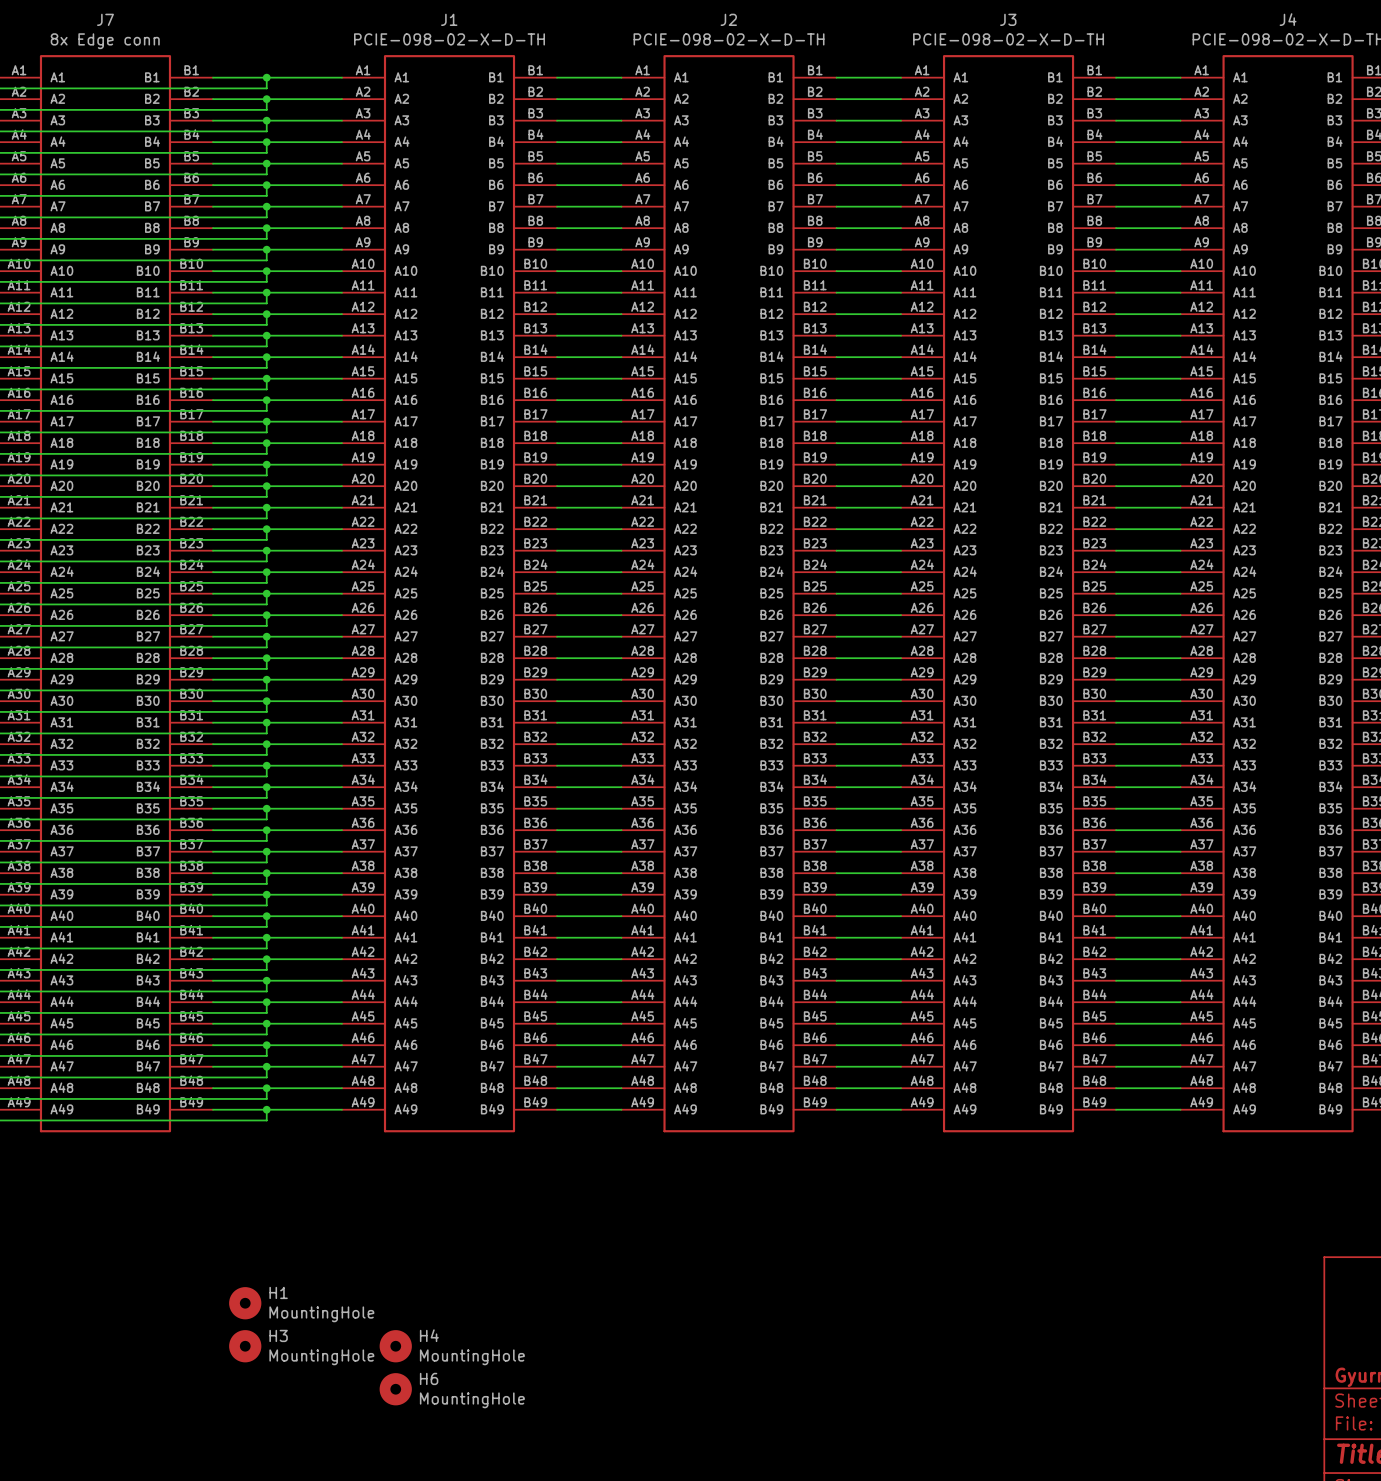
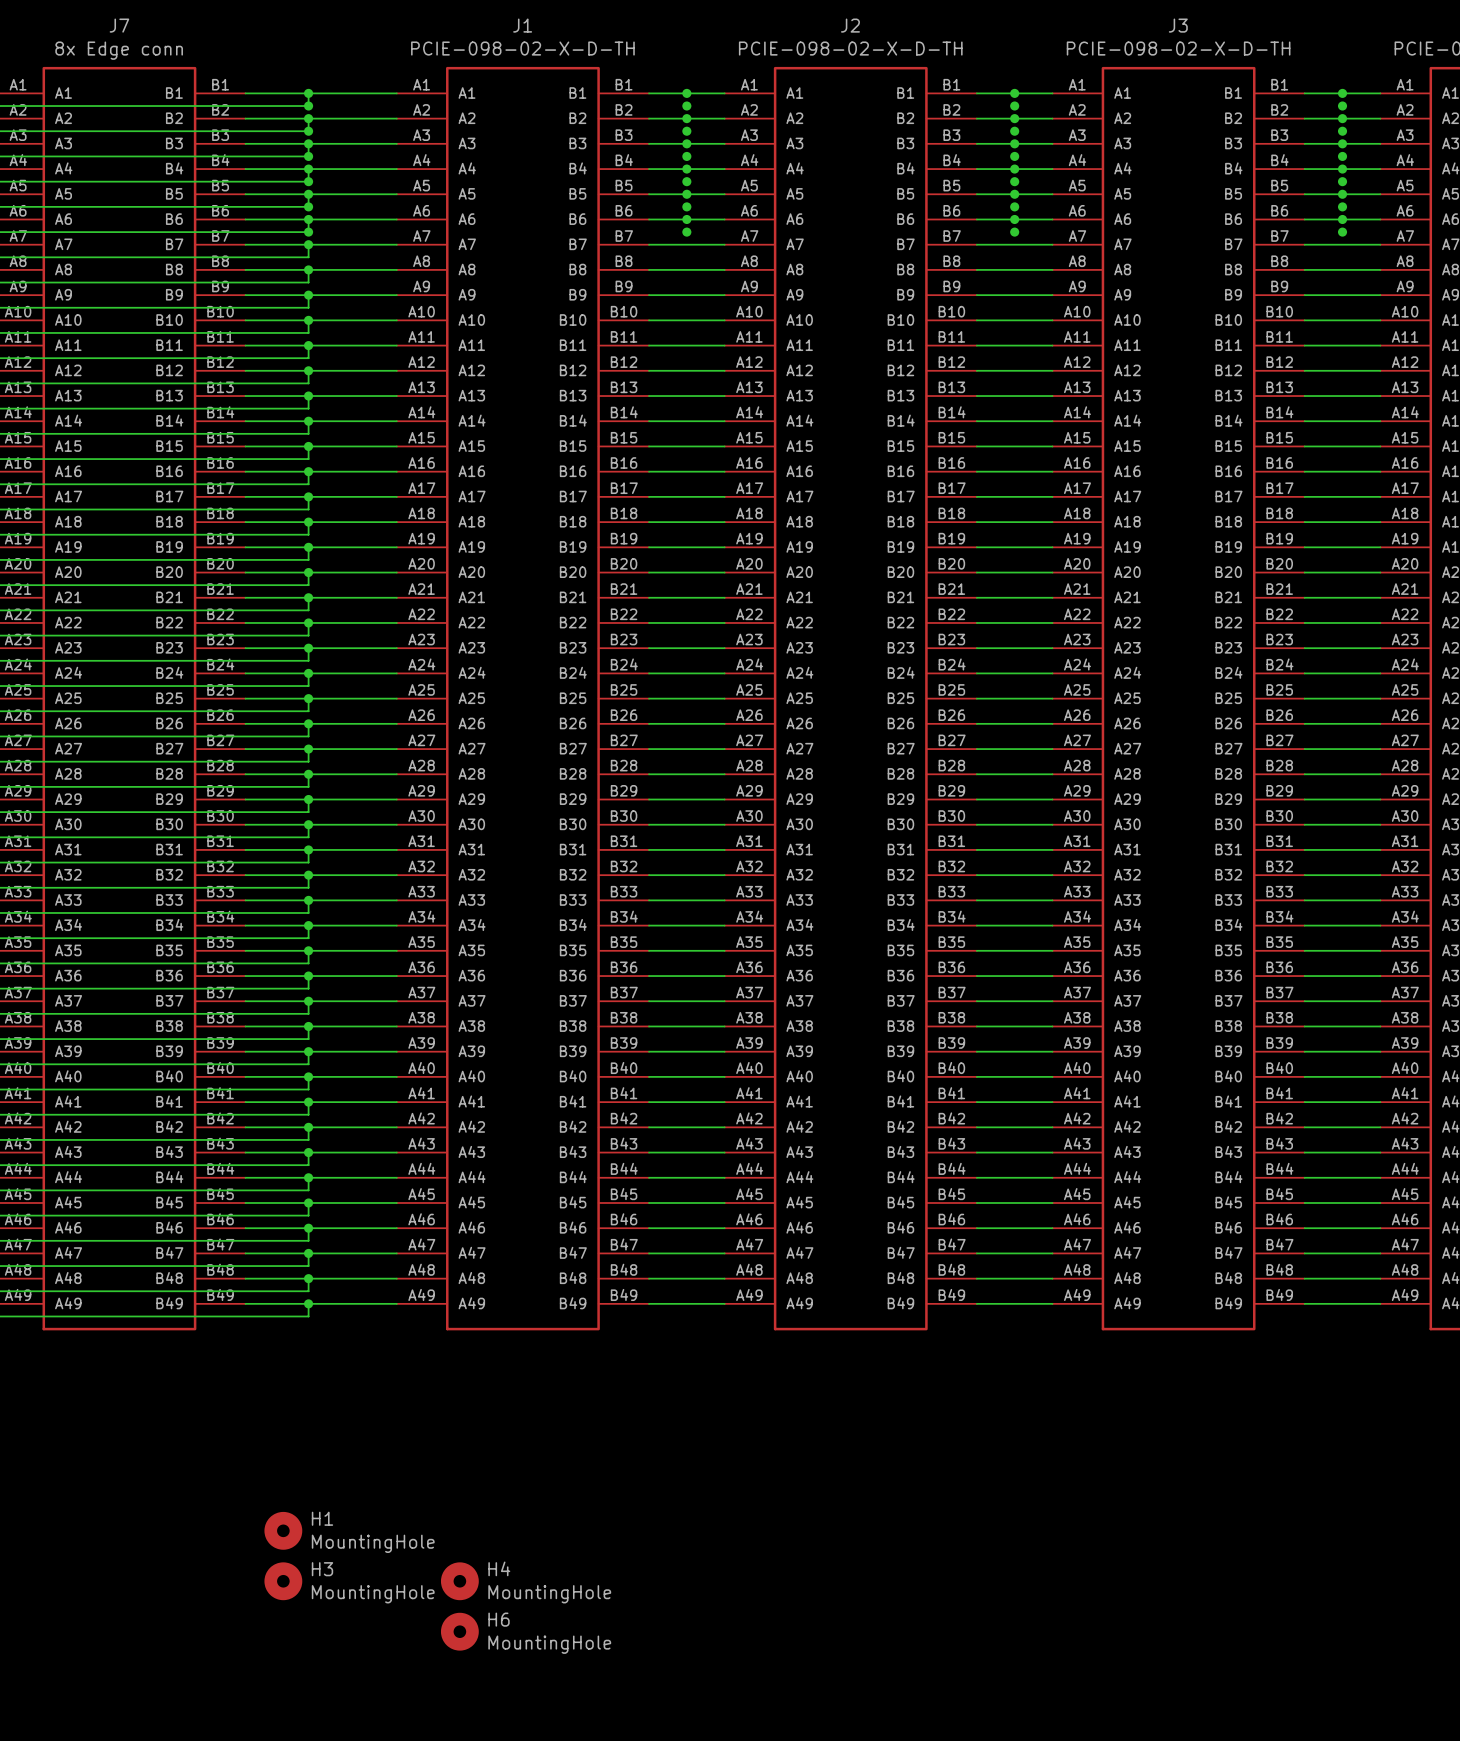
junction: none -> (686, 93)
junction: none -> (1014, 93)
junction: none -> (1342, 93)
junction: none -> (308, 106)
junction: none -> (686, 106)
junction: none -> (1014, 106)
junction: none -> (1342, 106)
junction: none -> (686, 118)
junction: none -> (1014, 118)
junction: none -> (1342, 118)
junction: none -> (308, 131)
junction: none -> (686, 131)
junction: none -> (1014, 131)
junction: none -> (1342, 131)
junction: none -> (686, 143)
junction: none -> (1014, 143)
junction: none -> (1342, 143)
junction: none -> (308, 156)
junction: none -> (686, 156)
junction: none -> (1014, 156)
junction: none -> (1342, 156)
junction: none -> (686, 169)
junction: none -> (1014, 169)
junction: none -> (1342, 169)
junction: none -> (308, 181)
junction: none -> (686, 181)
junction: none -> (1014, 181)
junction: none -> (1342, 181)
junction: none -> (686, 194)
junction: none -> (1014, 194)
junction: none -> (1342, 194)
junction: none -> (308, 206)
junction: none -> (686, 206)
junction: none -> (1014, 206)
junction: none -> (1342, 206)
junction: none -> (686, 219)
junction: none -> (1014, 219)
junction: none -> (1342, 219)
junction: none -> (308, 232)
junction: none -> (686, 232)
junction: none -> (1014, 232)
junction: none -> (1342, 232)

